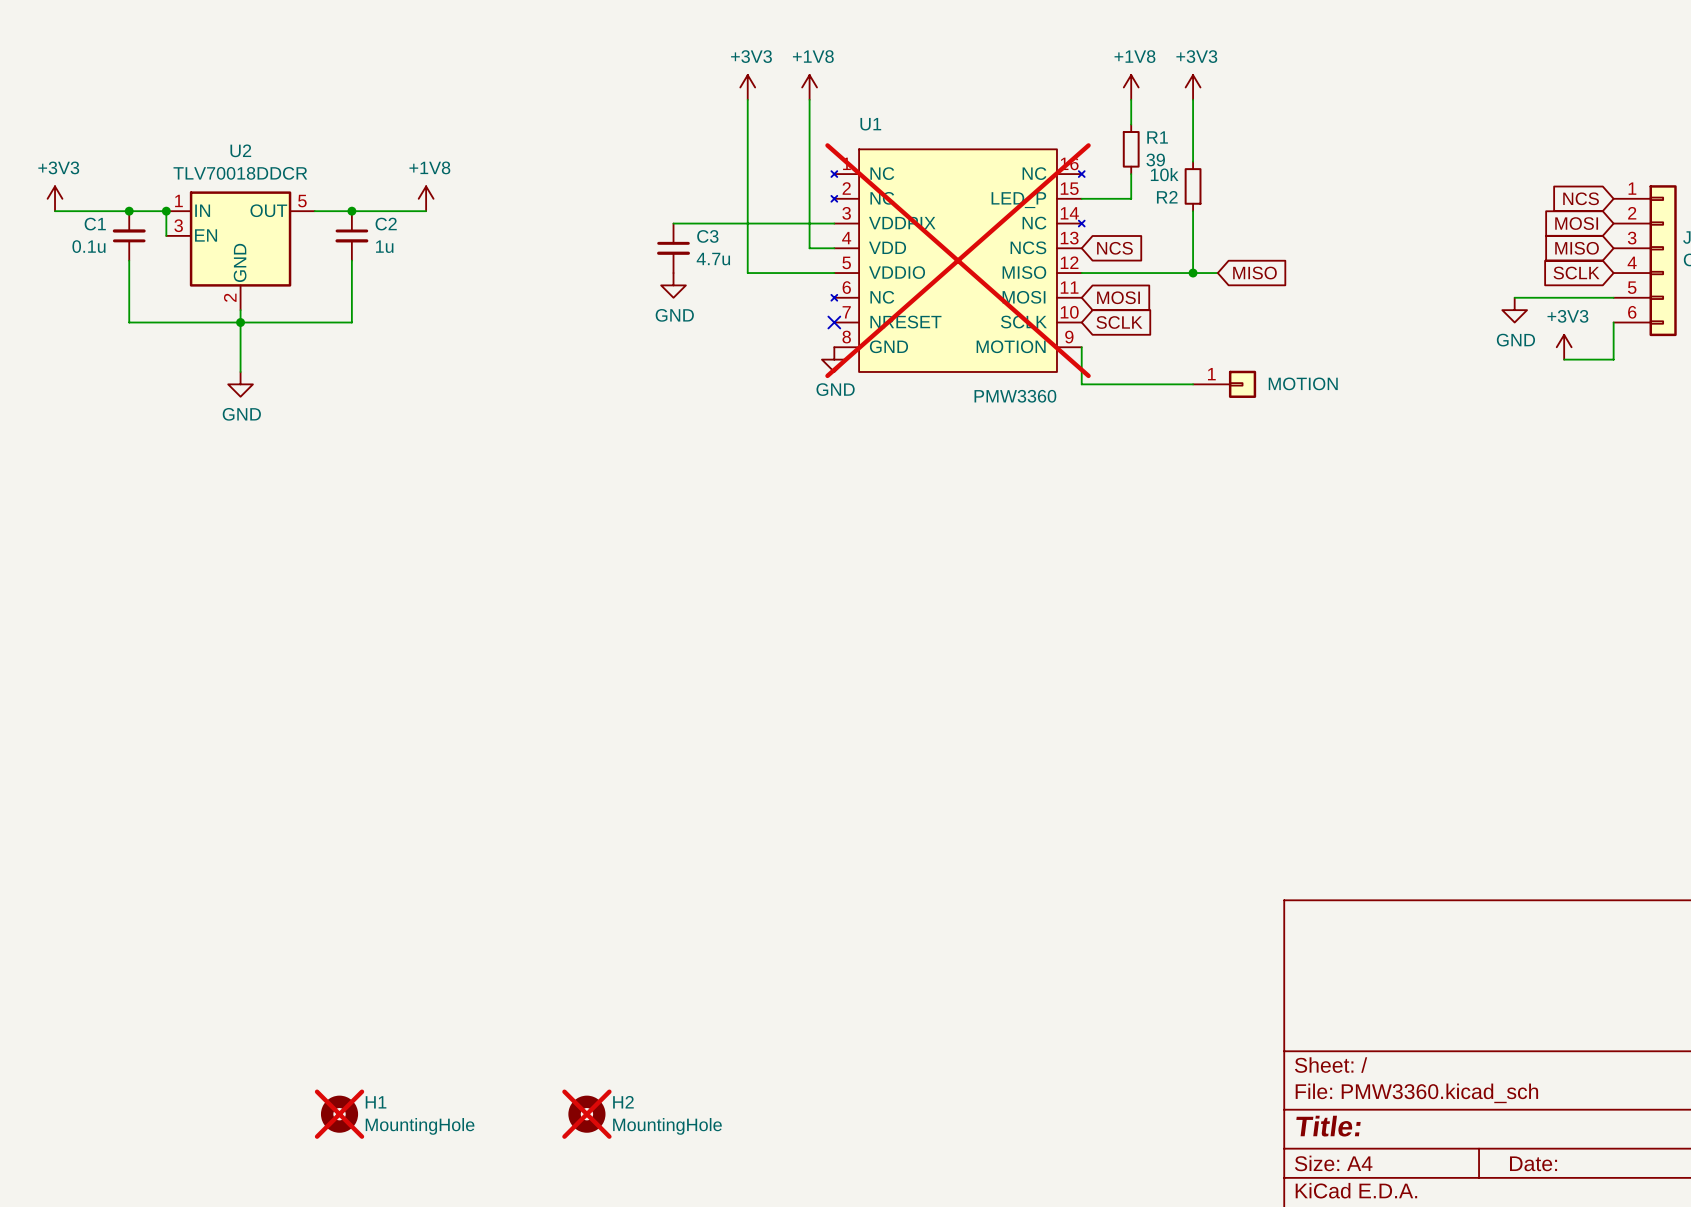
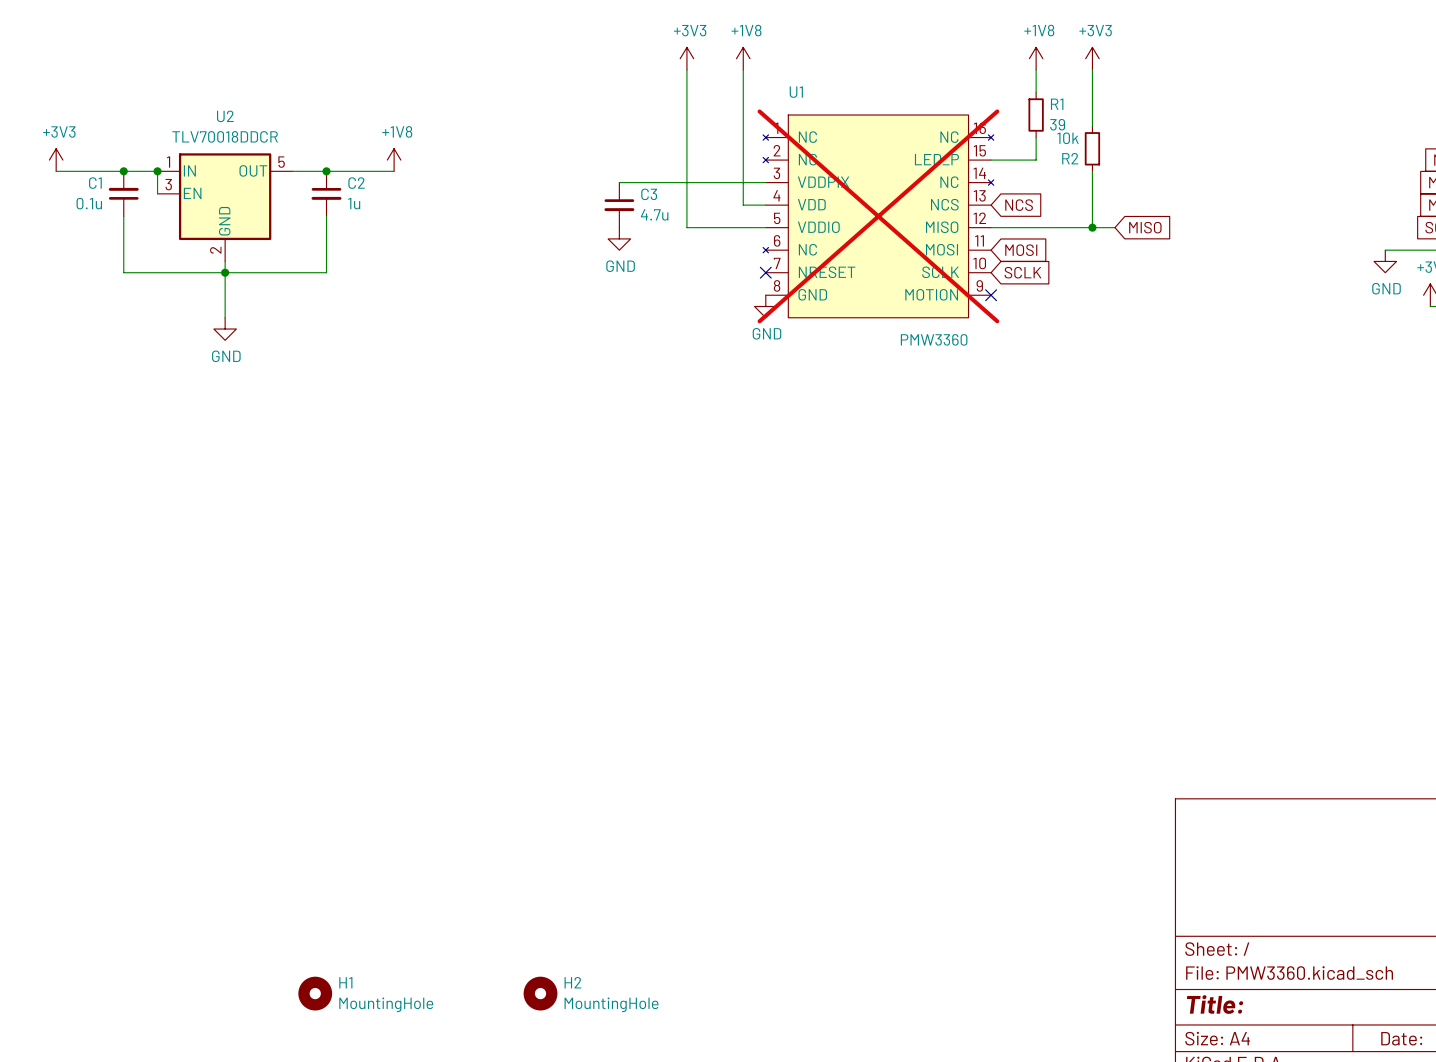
wire: (1081, 347) (1081, 384) (1193, 384) -> none
no-connect mark: none -> (991, 295)
part: MOTION (1224, 384) -> none
H1 do-not-place cross: (339, 1114) -> none
H2 do-not-place cross: (586, 1114) -> none

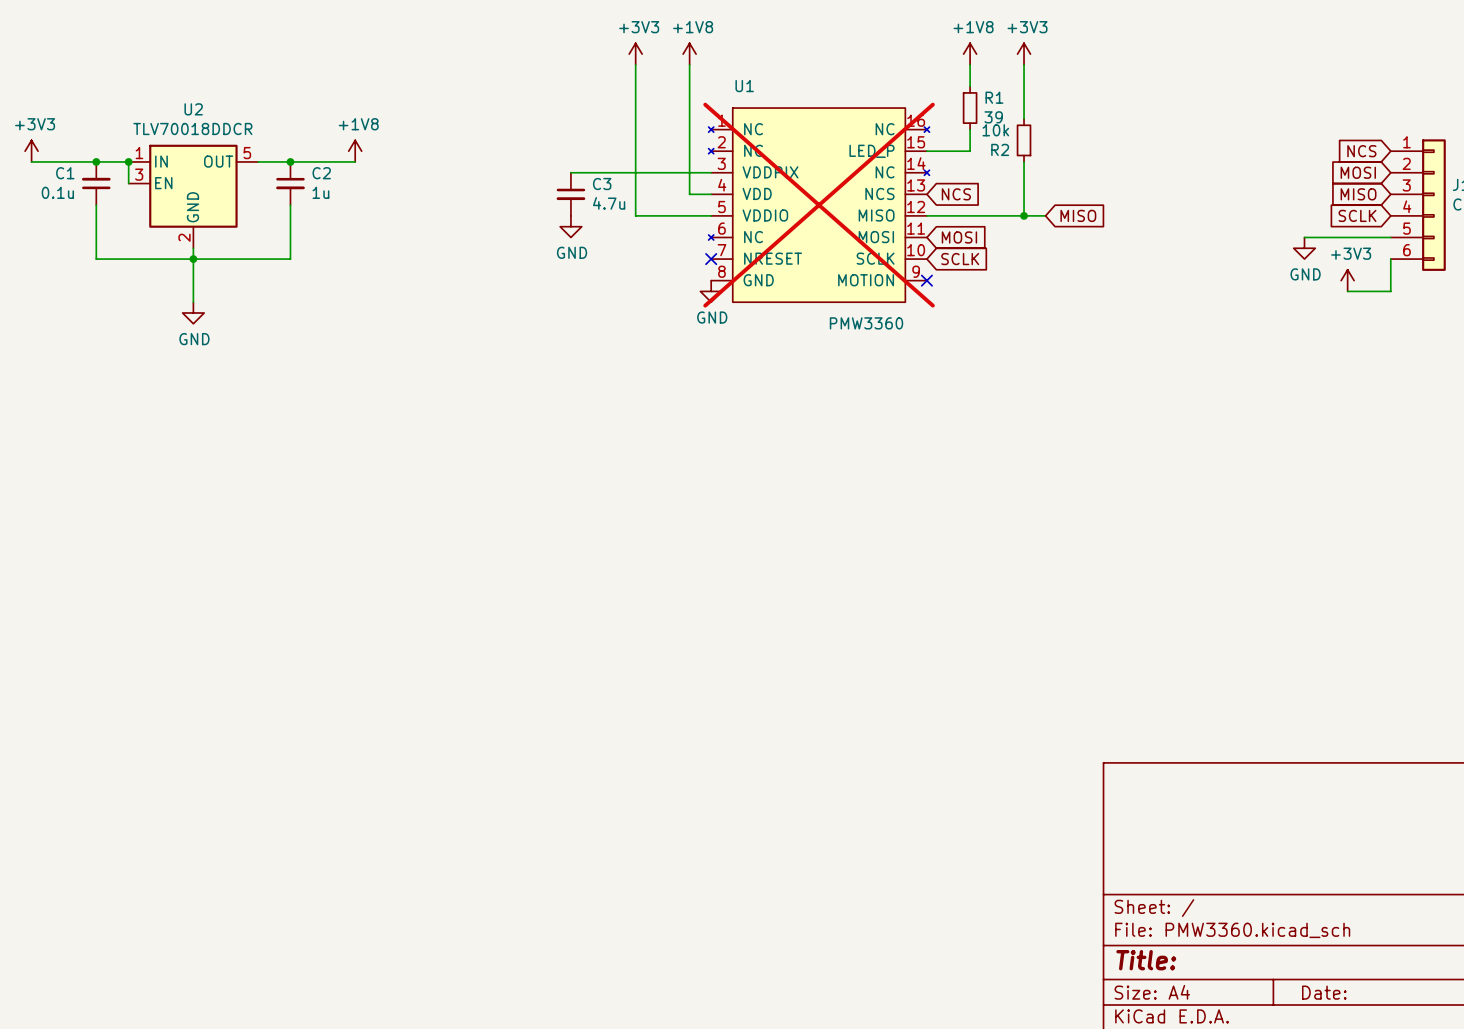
H1: MountingHole (315, 993) -> none
H2: MountingHole (540, 993) -> none

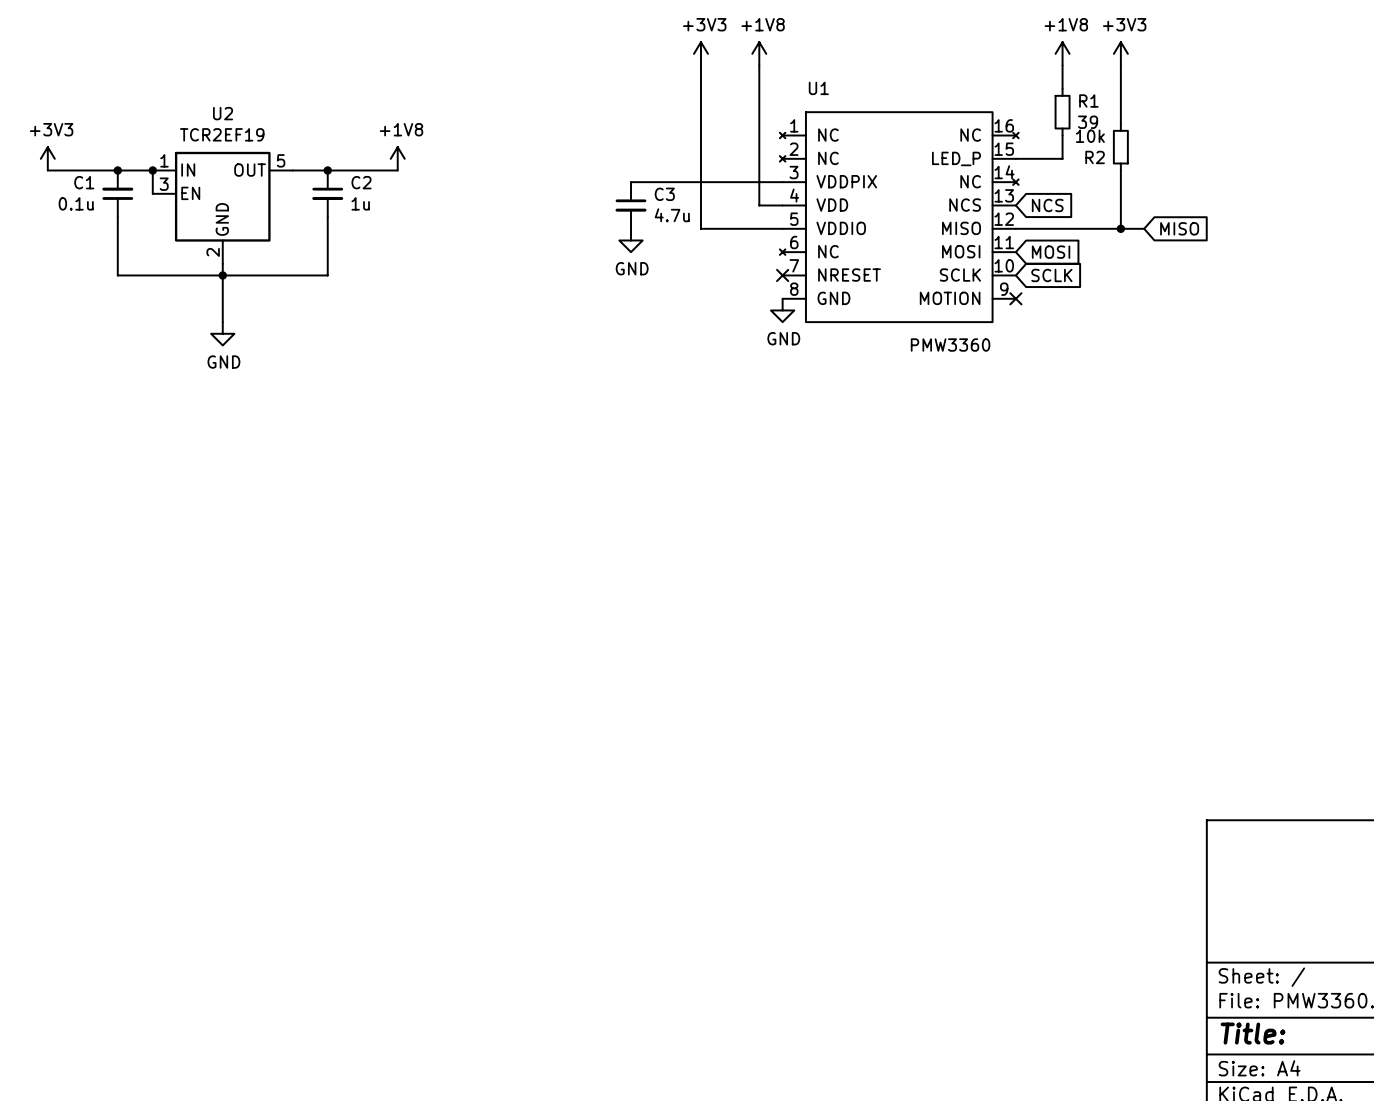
U2 value: TLV70018DDCR (192, 128) -> TCR2EF19 (222, 134)
U1 do-not-place cross: (819, 205) -> none

